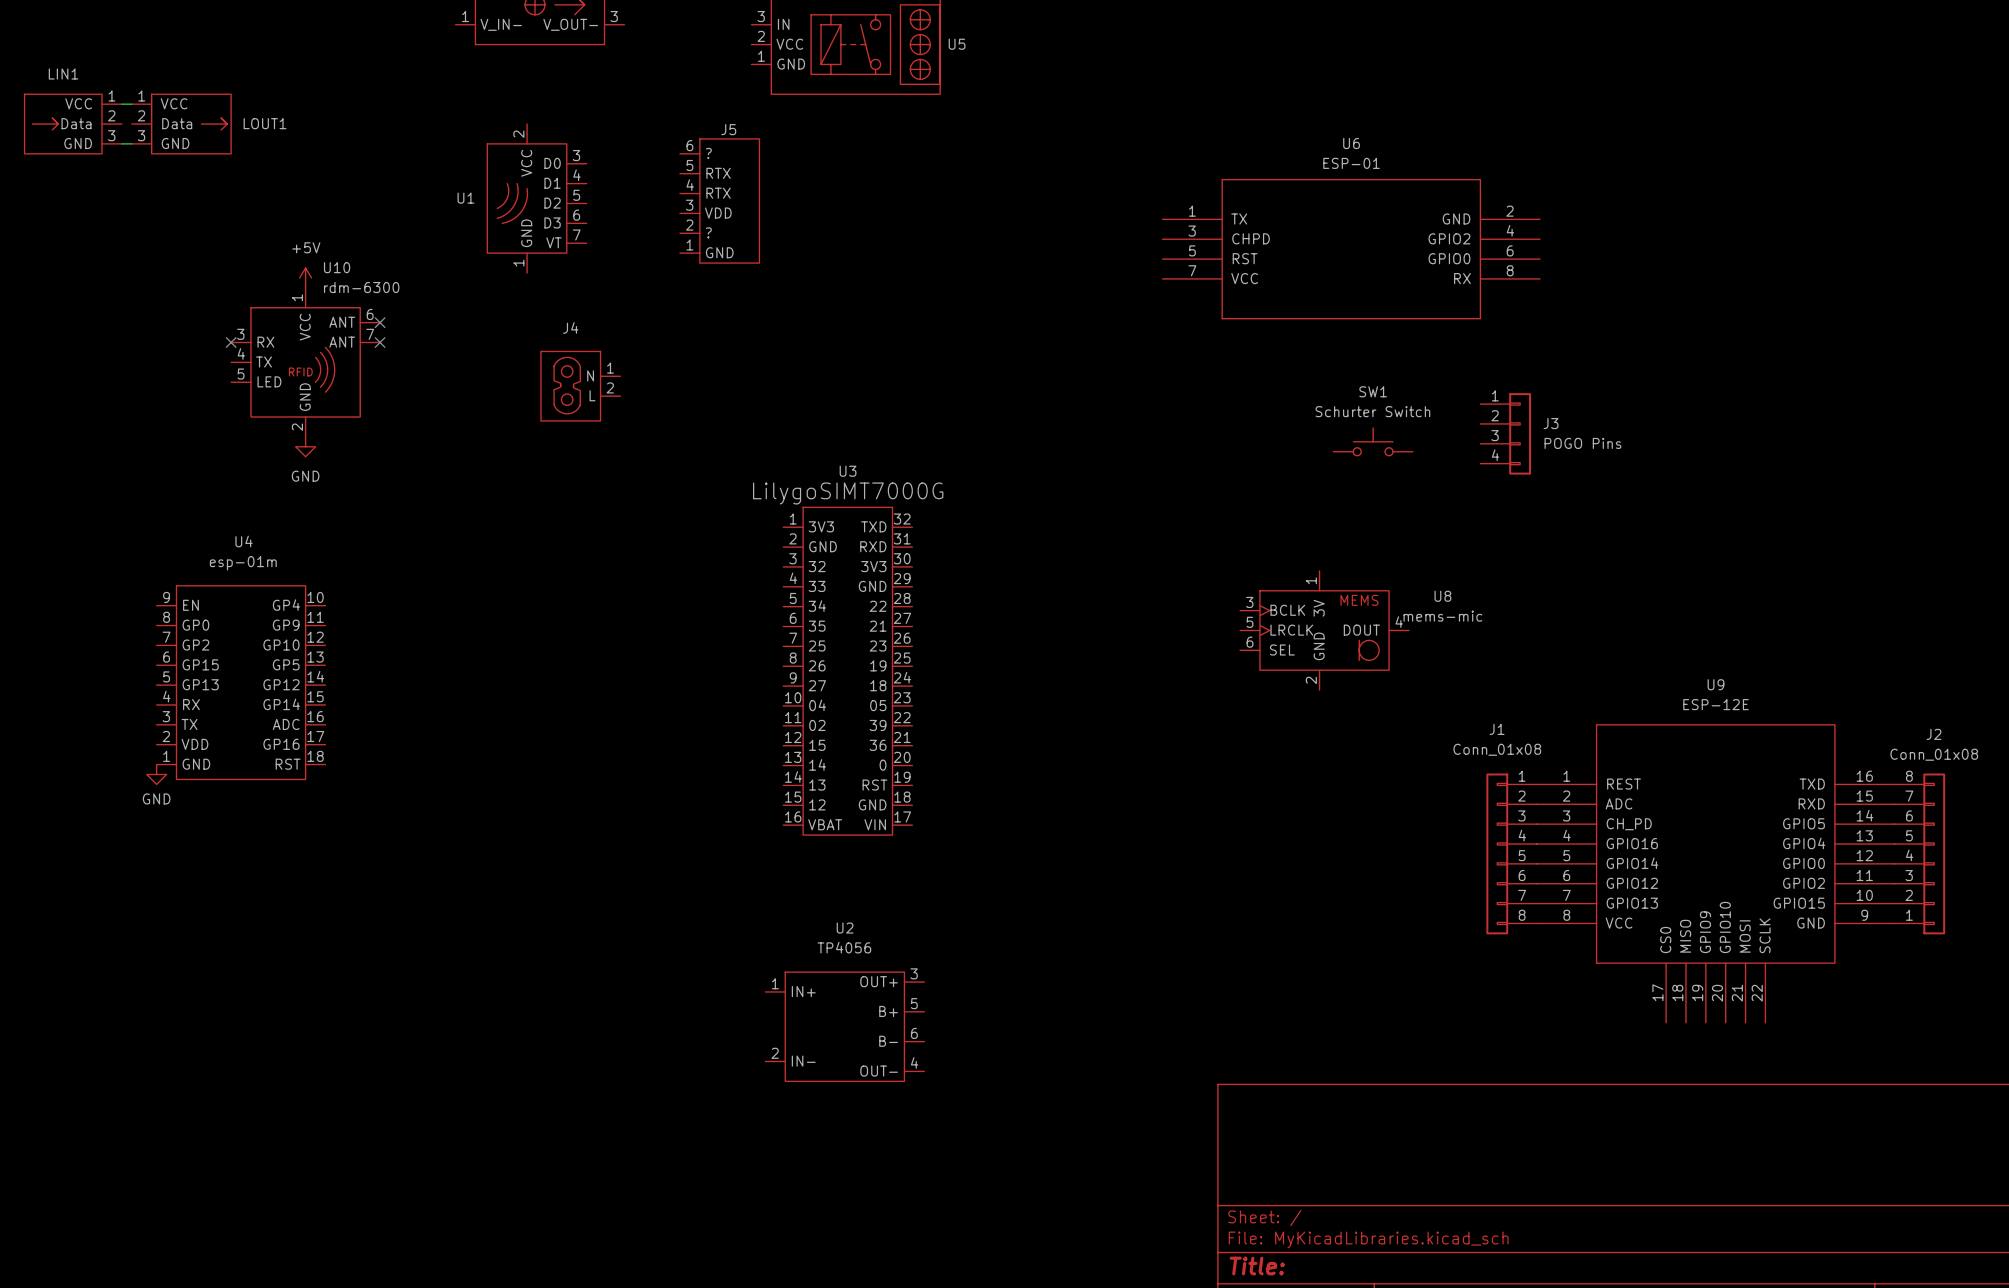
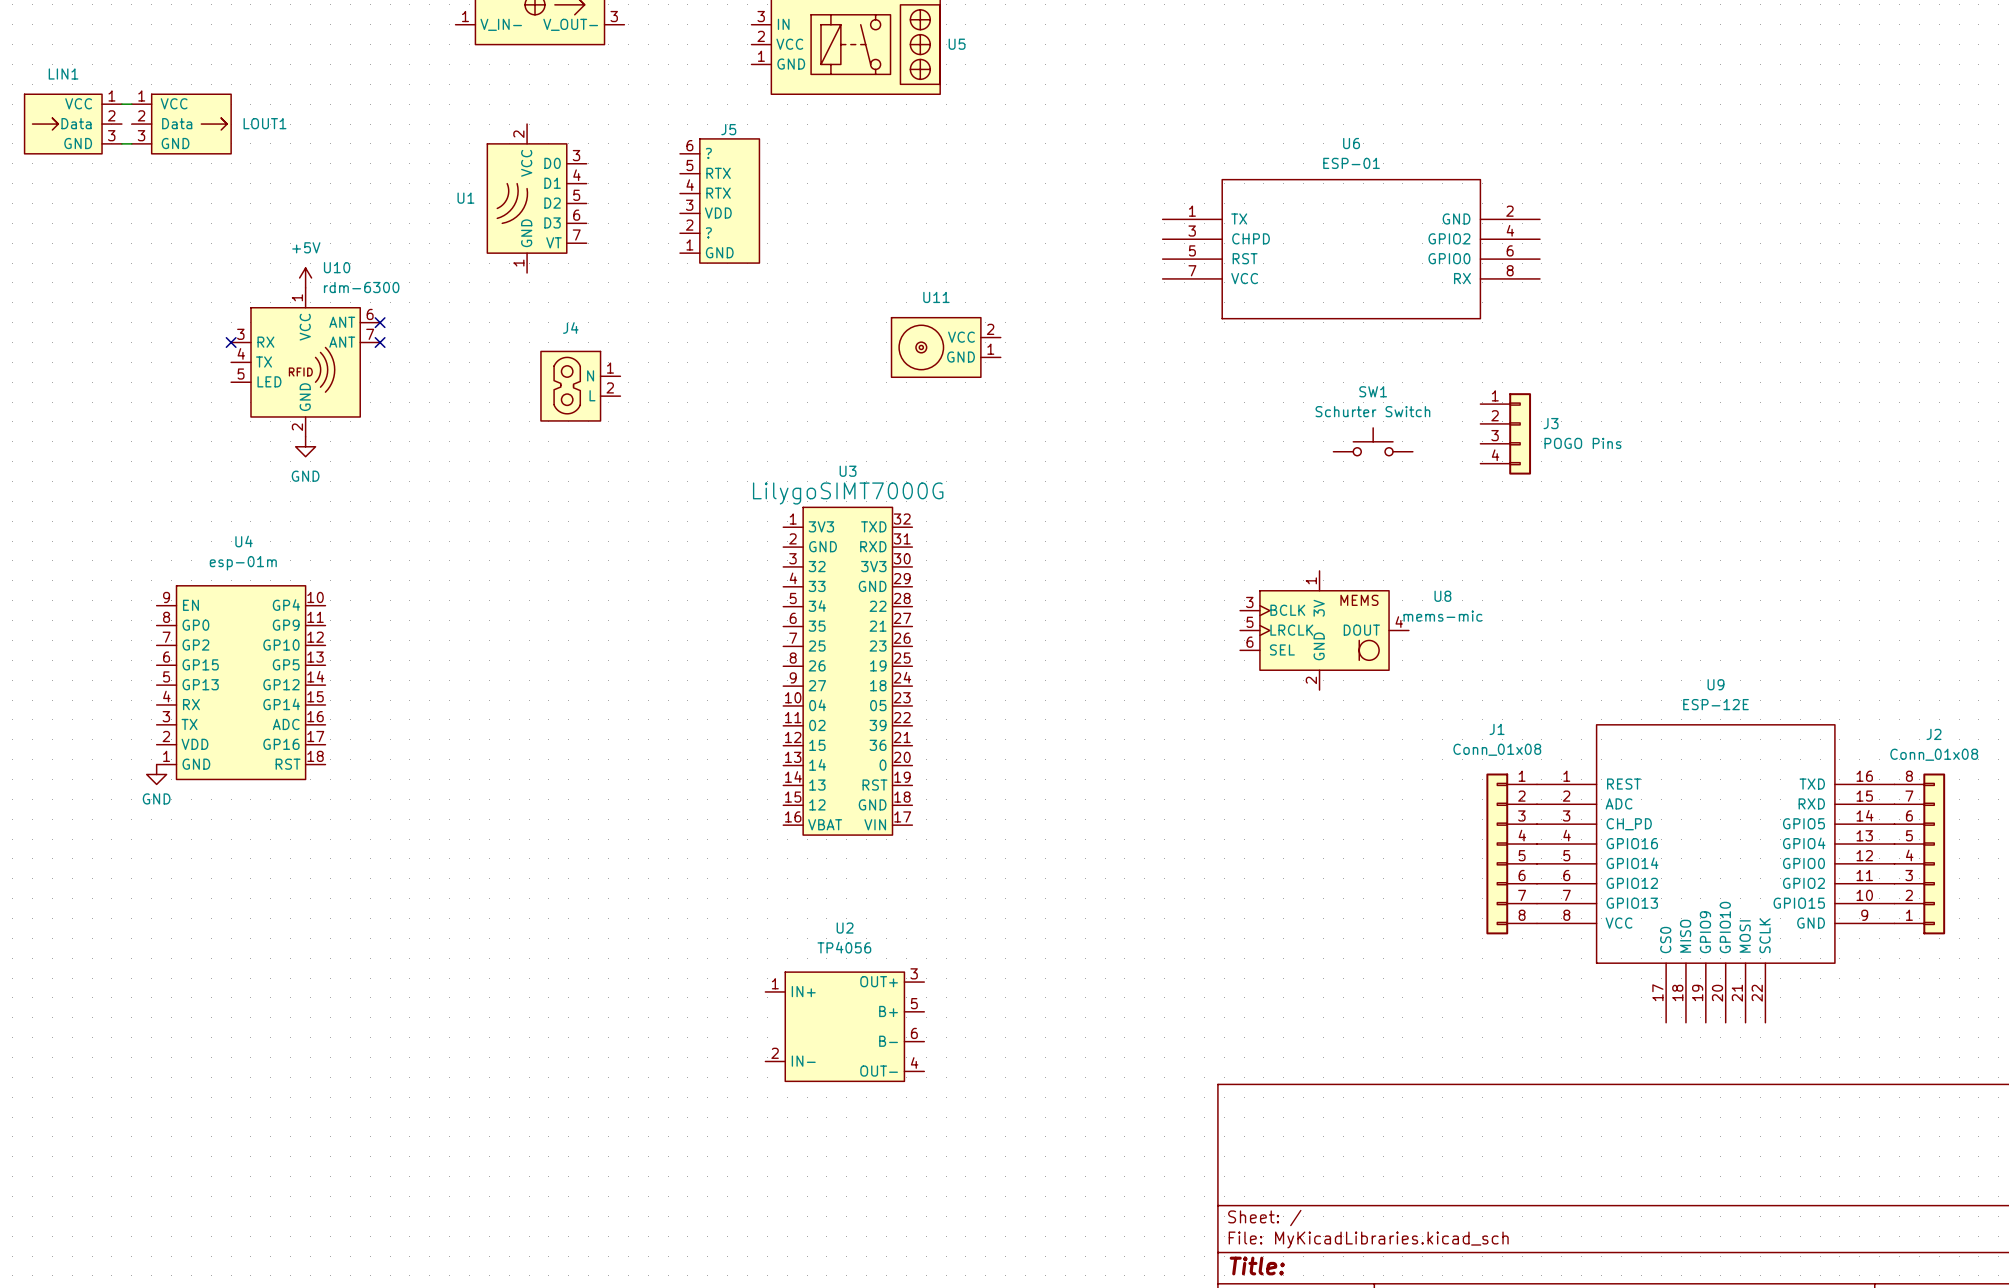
U11: none -> (946, 347)

